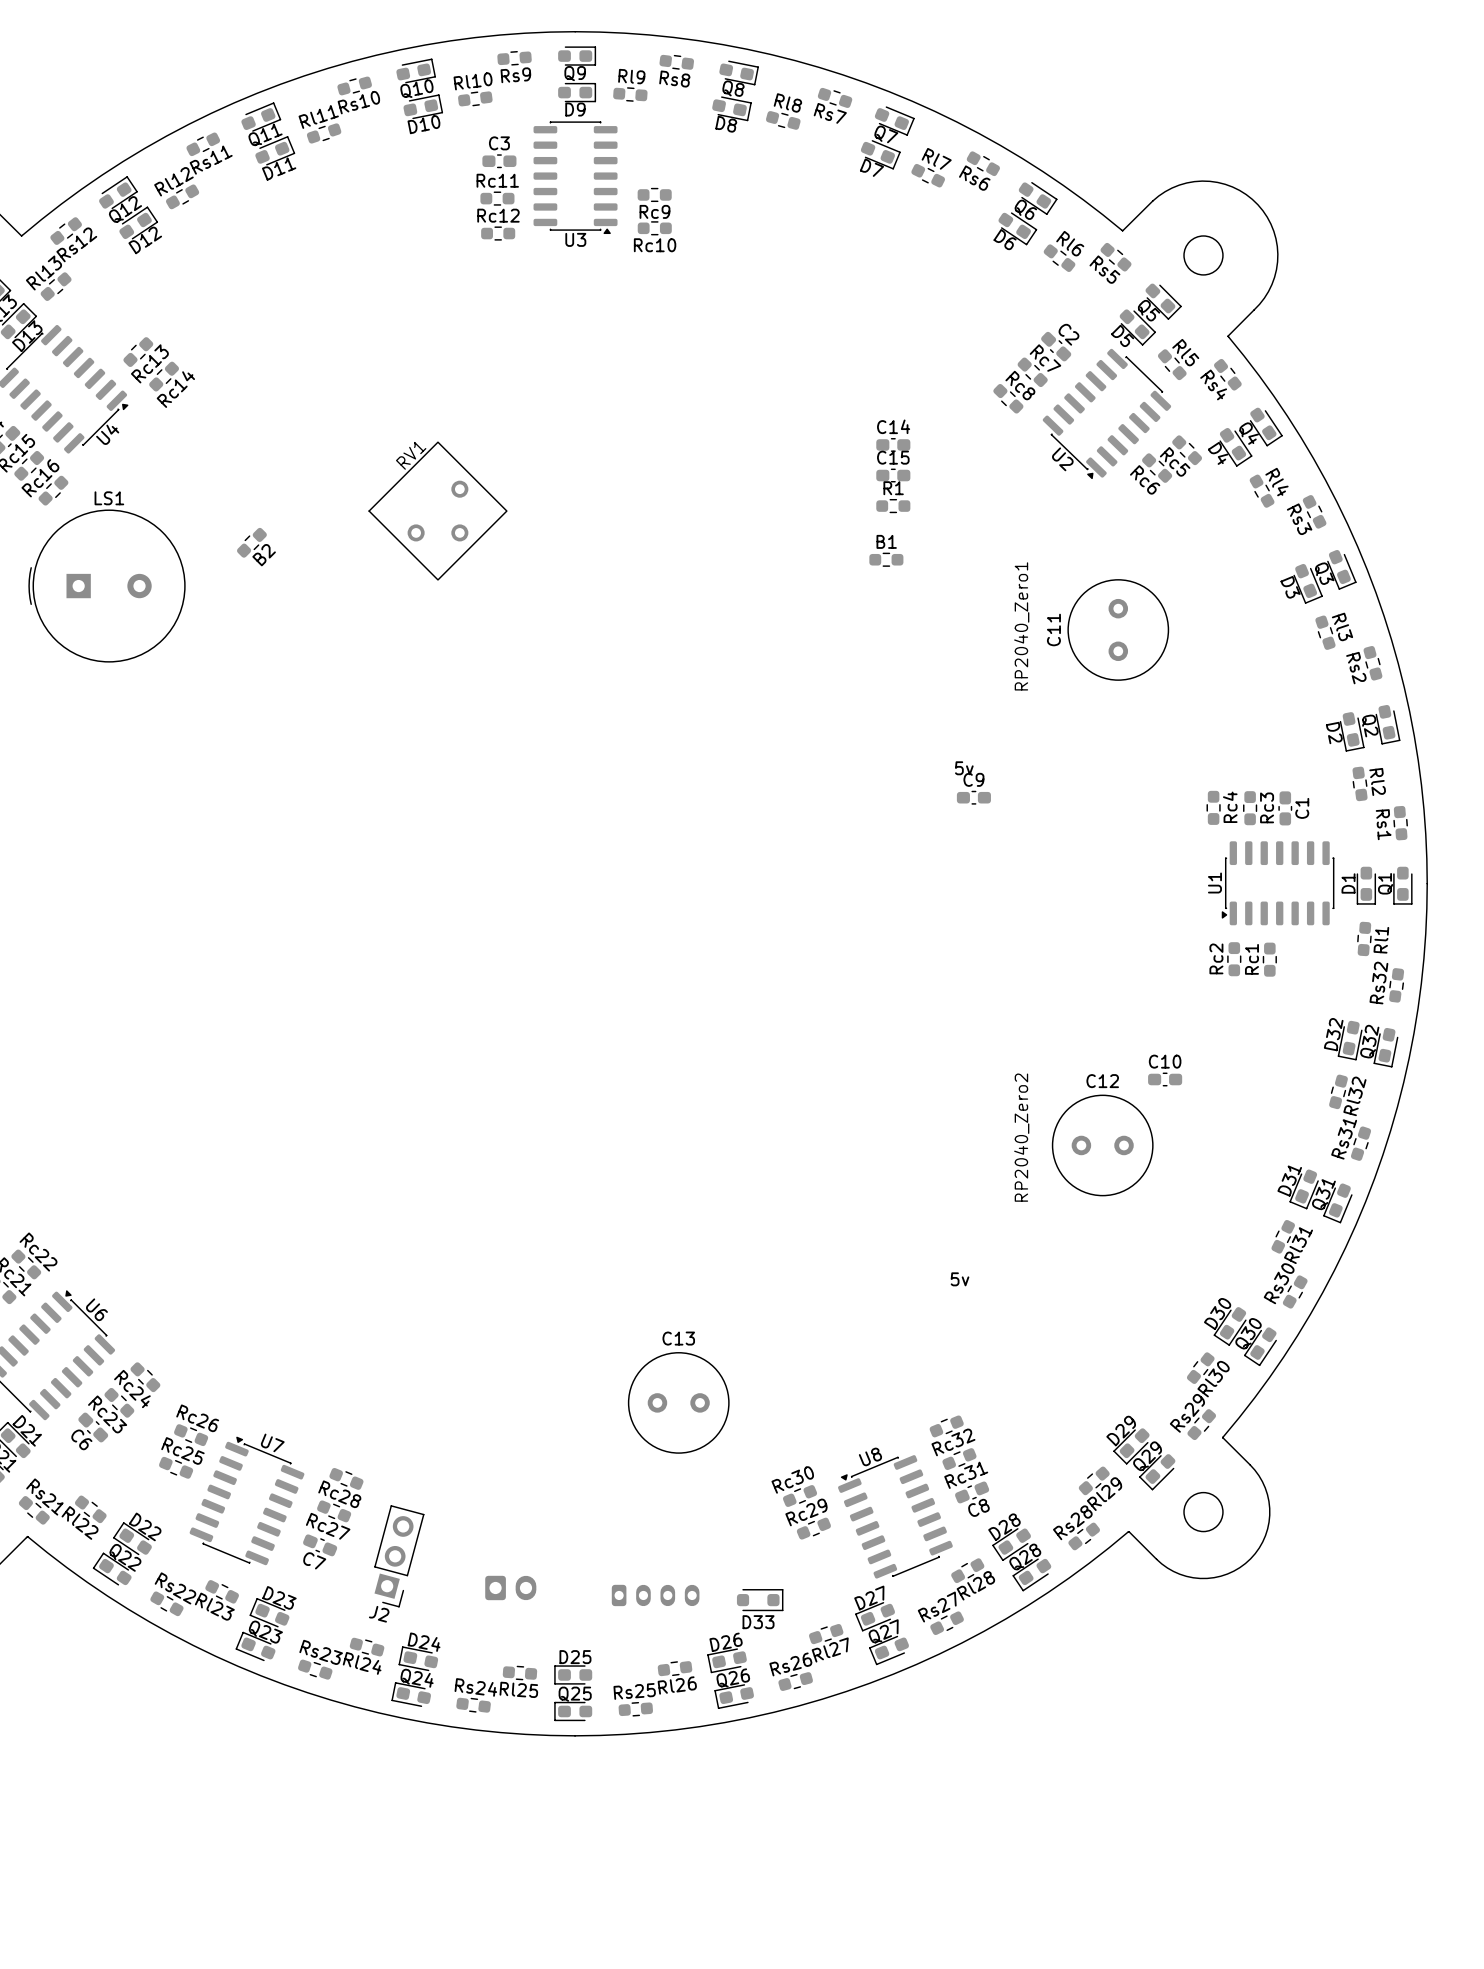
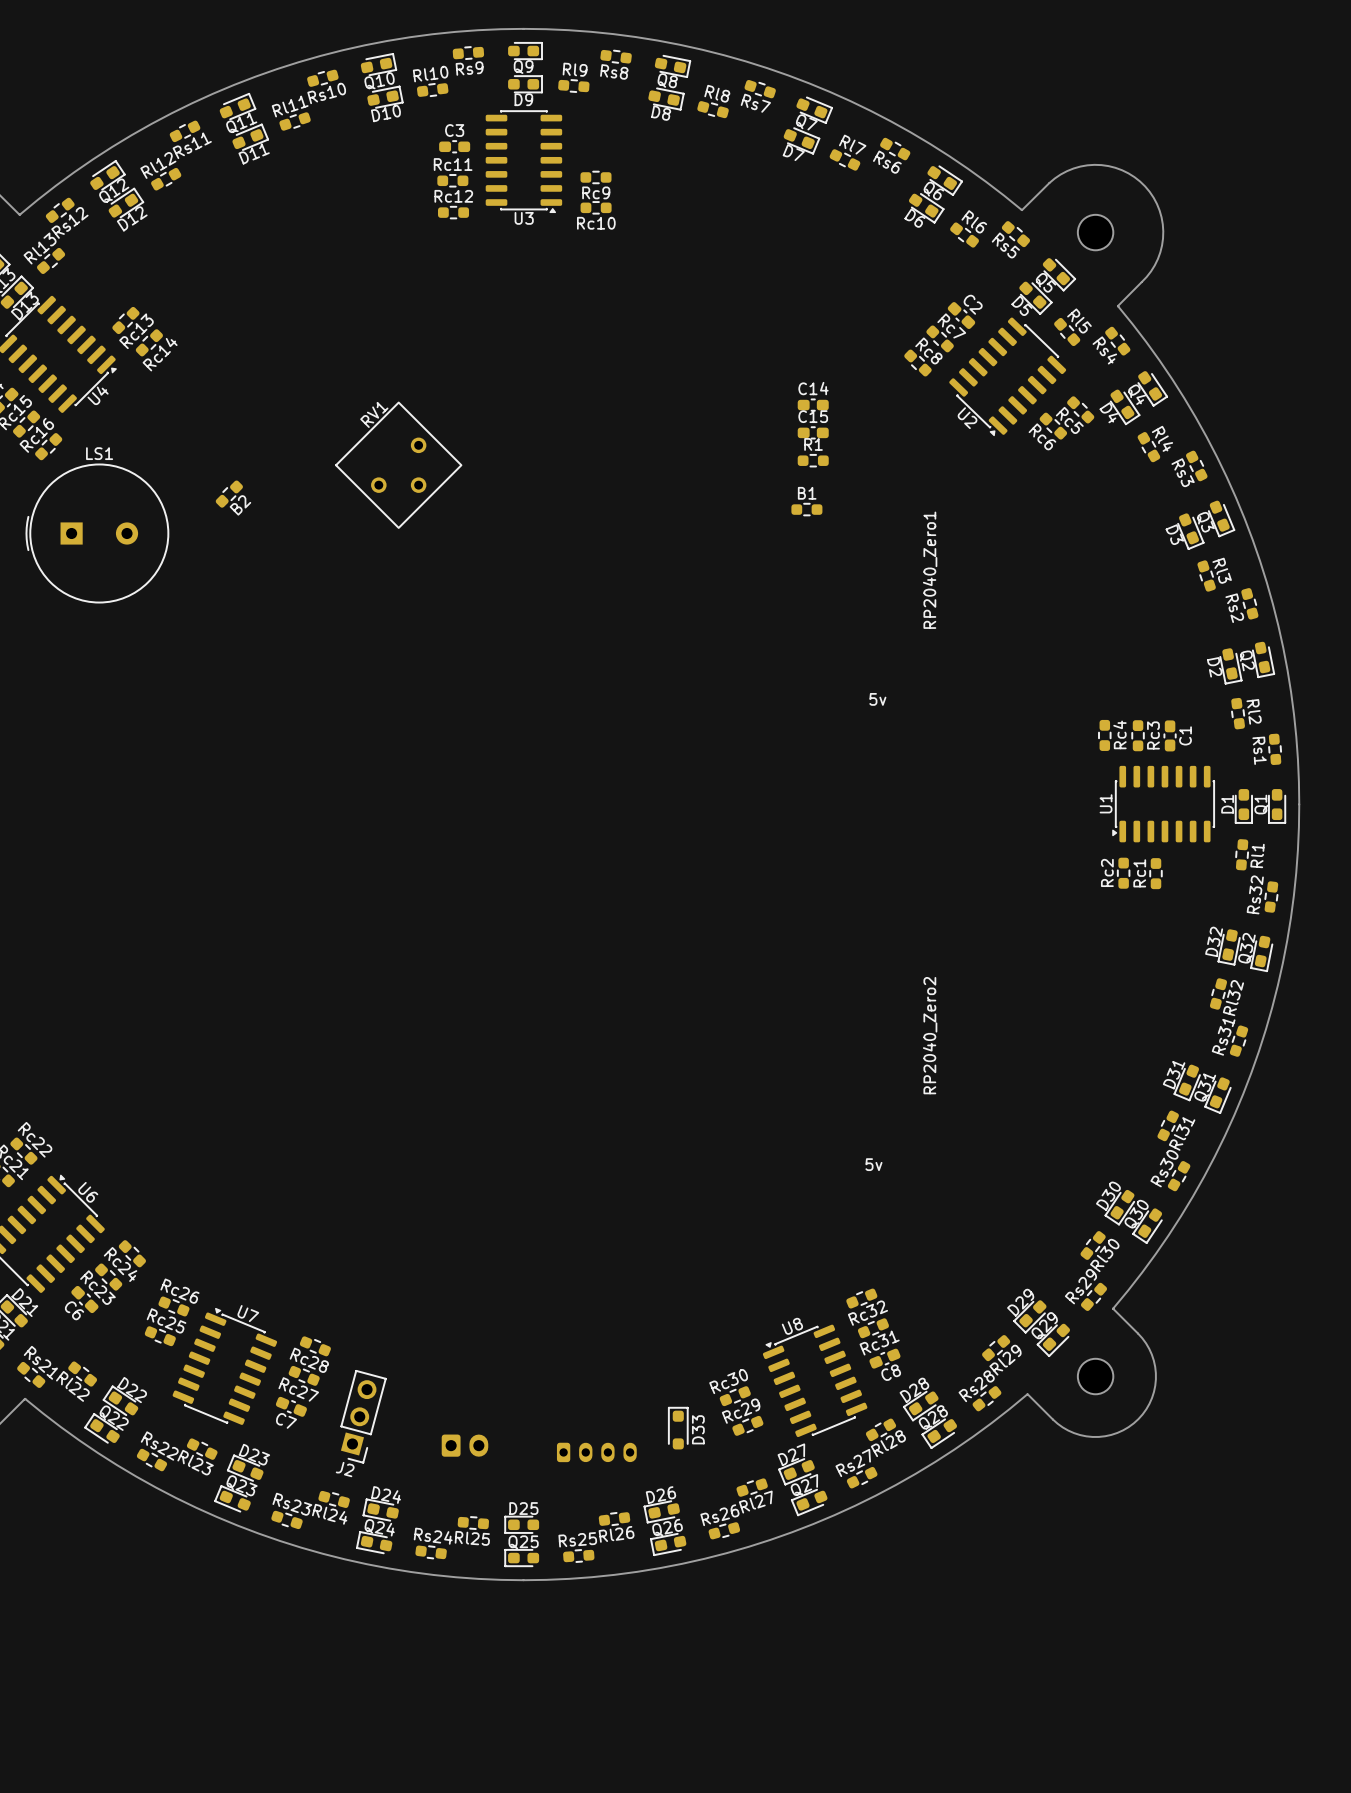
C11: (1118, 629) -> none
C9: (973, 797) -> none
C10: (1165, 1079) -> none
C12: (1102, 1145) -> none
C13: (678, 1402) -> none
Rc30 position: (800, 1496) -> (735, 1396)
Rc29 position: (813, 1528) -> (747, 1425)
D33 rotation: 0° (760, 1600) -> 90° counterclockwise (678, 1428)
D33 position: (760, 1600) -> (678, 1428)

